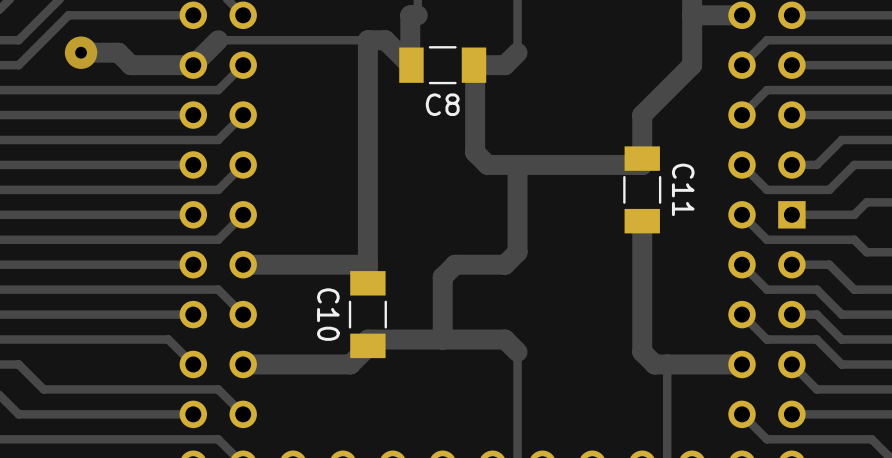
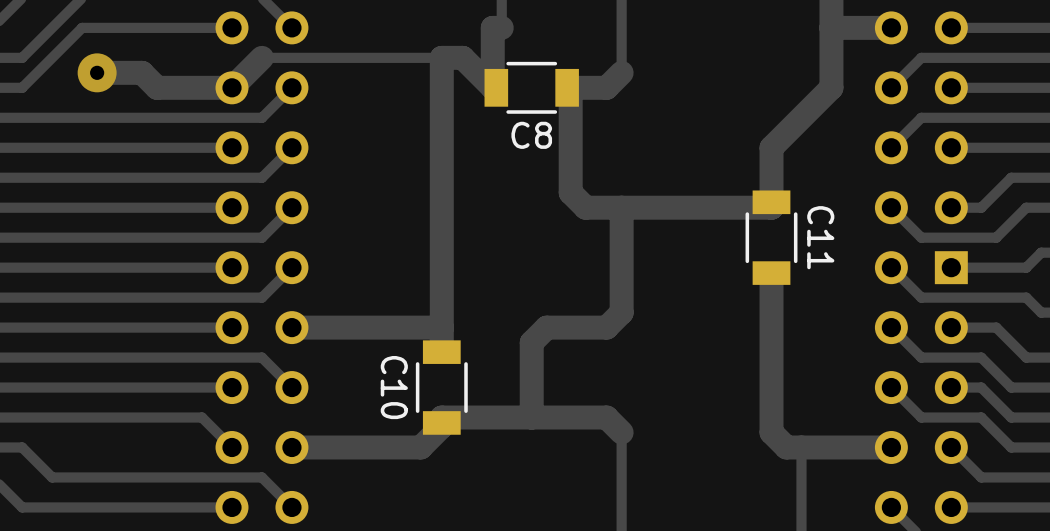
C8 footprint: [399, 46, 487, 85] -> [484, 61, 579, 114]
C11 footprint: [623, 146, 662, 234] -> [745, 190, 798, 285]
C10 footprint: [348, 271, 387, 359] -> [415, 340, 468, 435]

